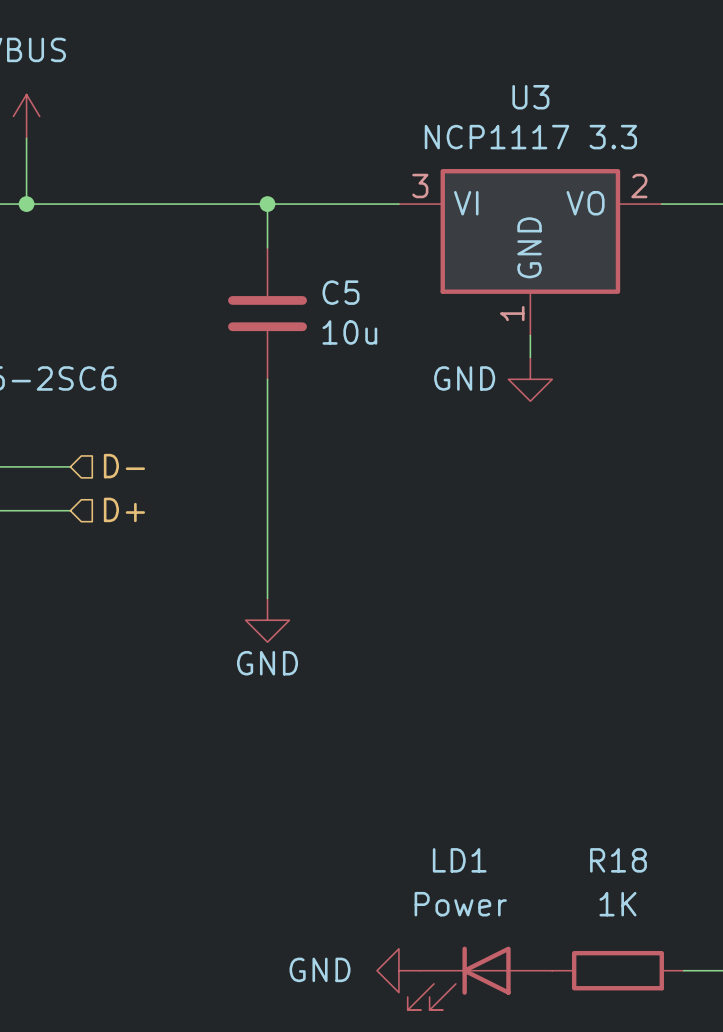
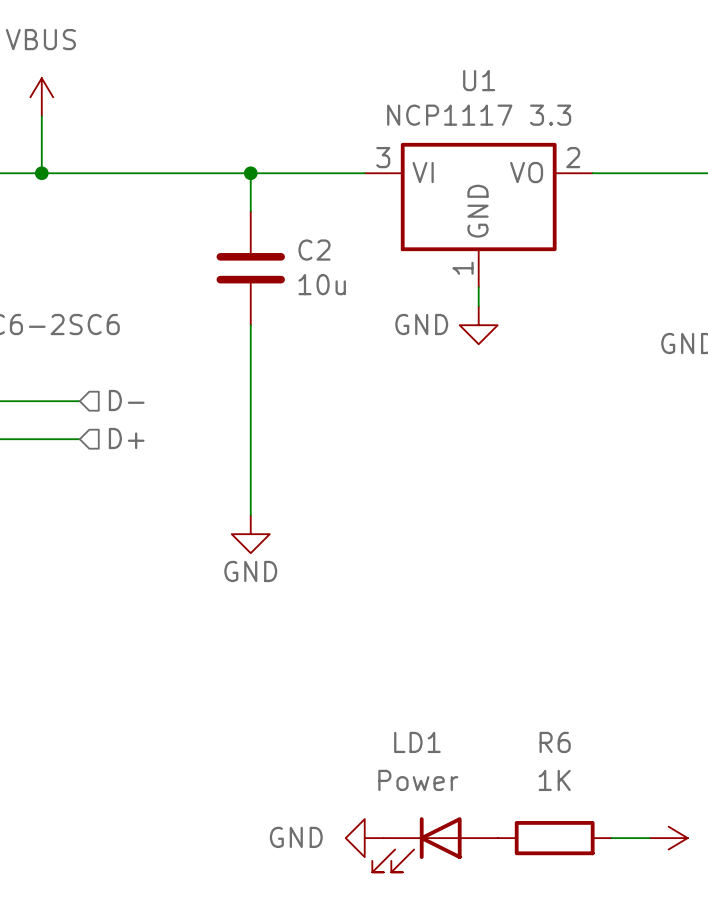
U3 name: U3 (530, 97) -> U1 (479, 80)
C5 name: C5 (341, 292) -> C2 (314, 250)
R18 name: R18 (618, 860) -> R6 (555, 742)

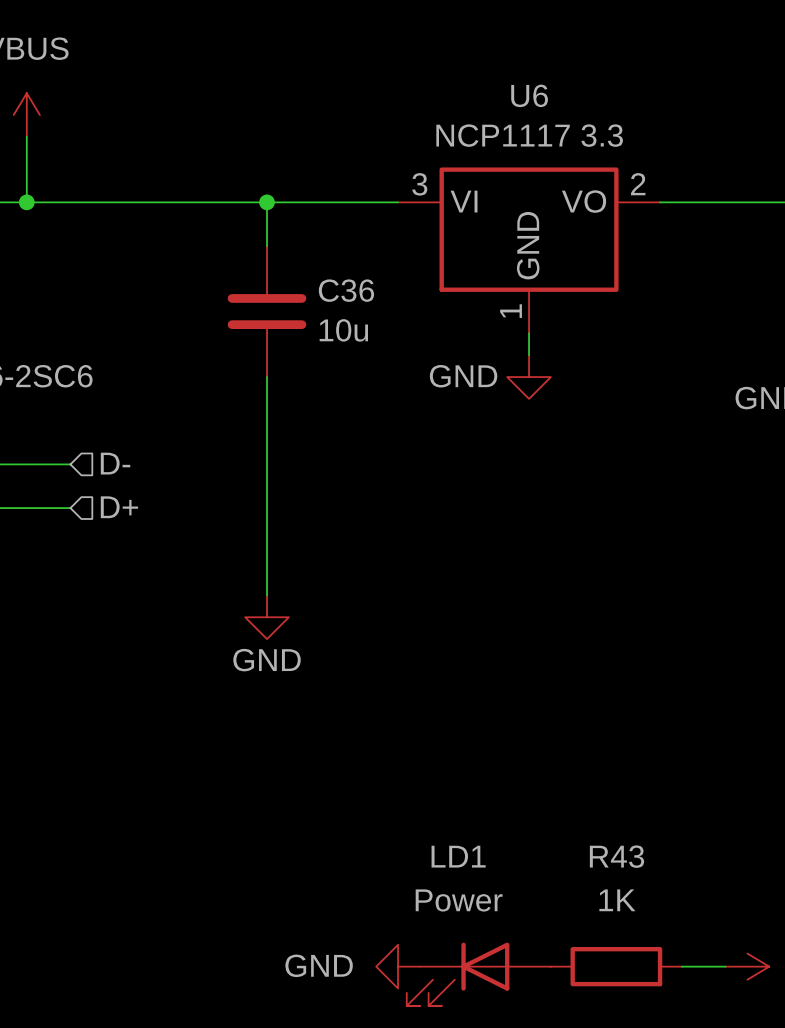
U1 name: U1 (479, 80) -> U6 (529, 95)
C2 name: C2 (314, 250) -> C36 (346, 290)
R6 name: R6 (555, 742) -> R43 (616, 856)

